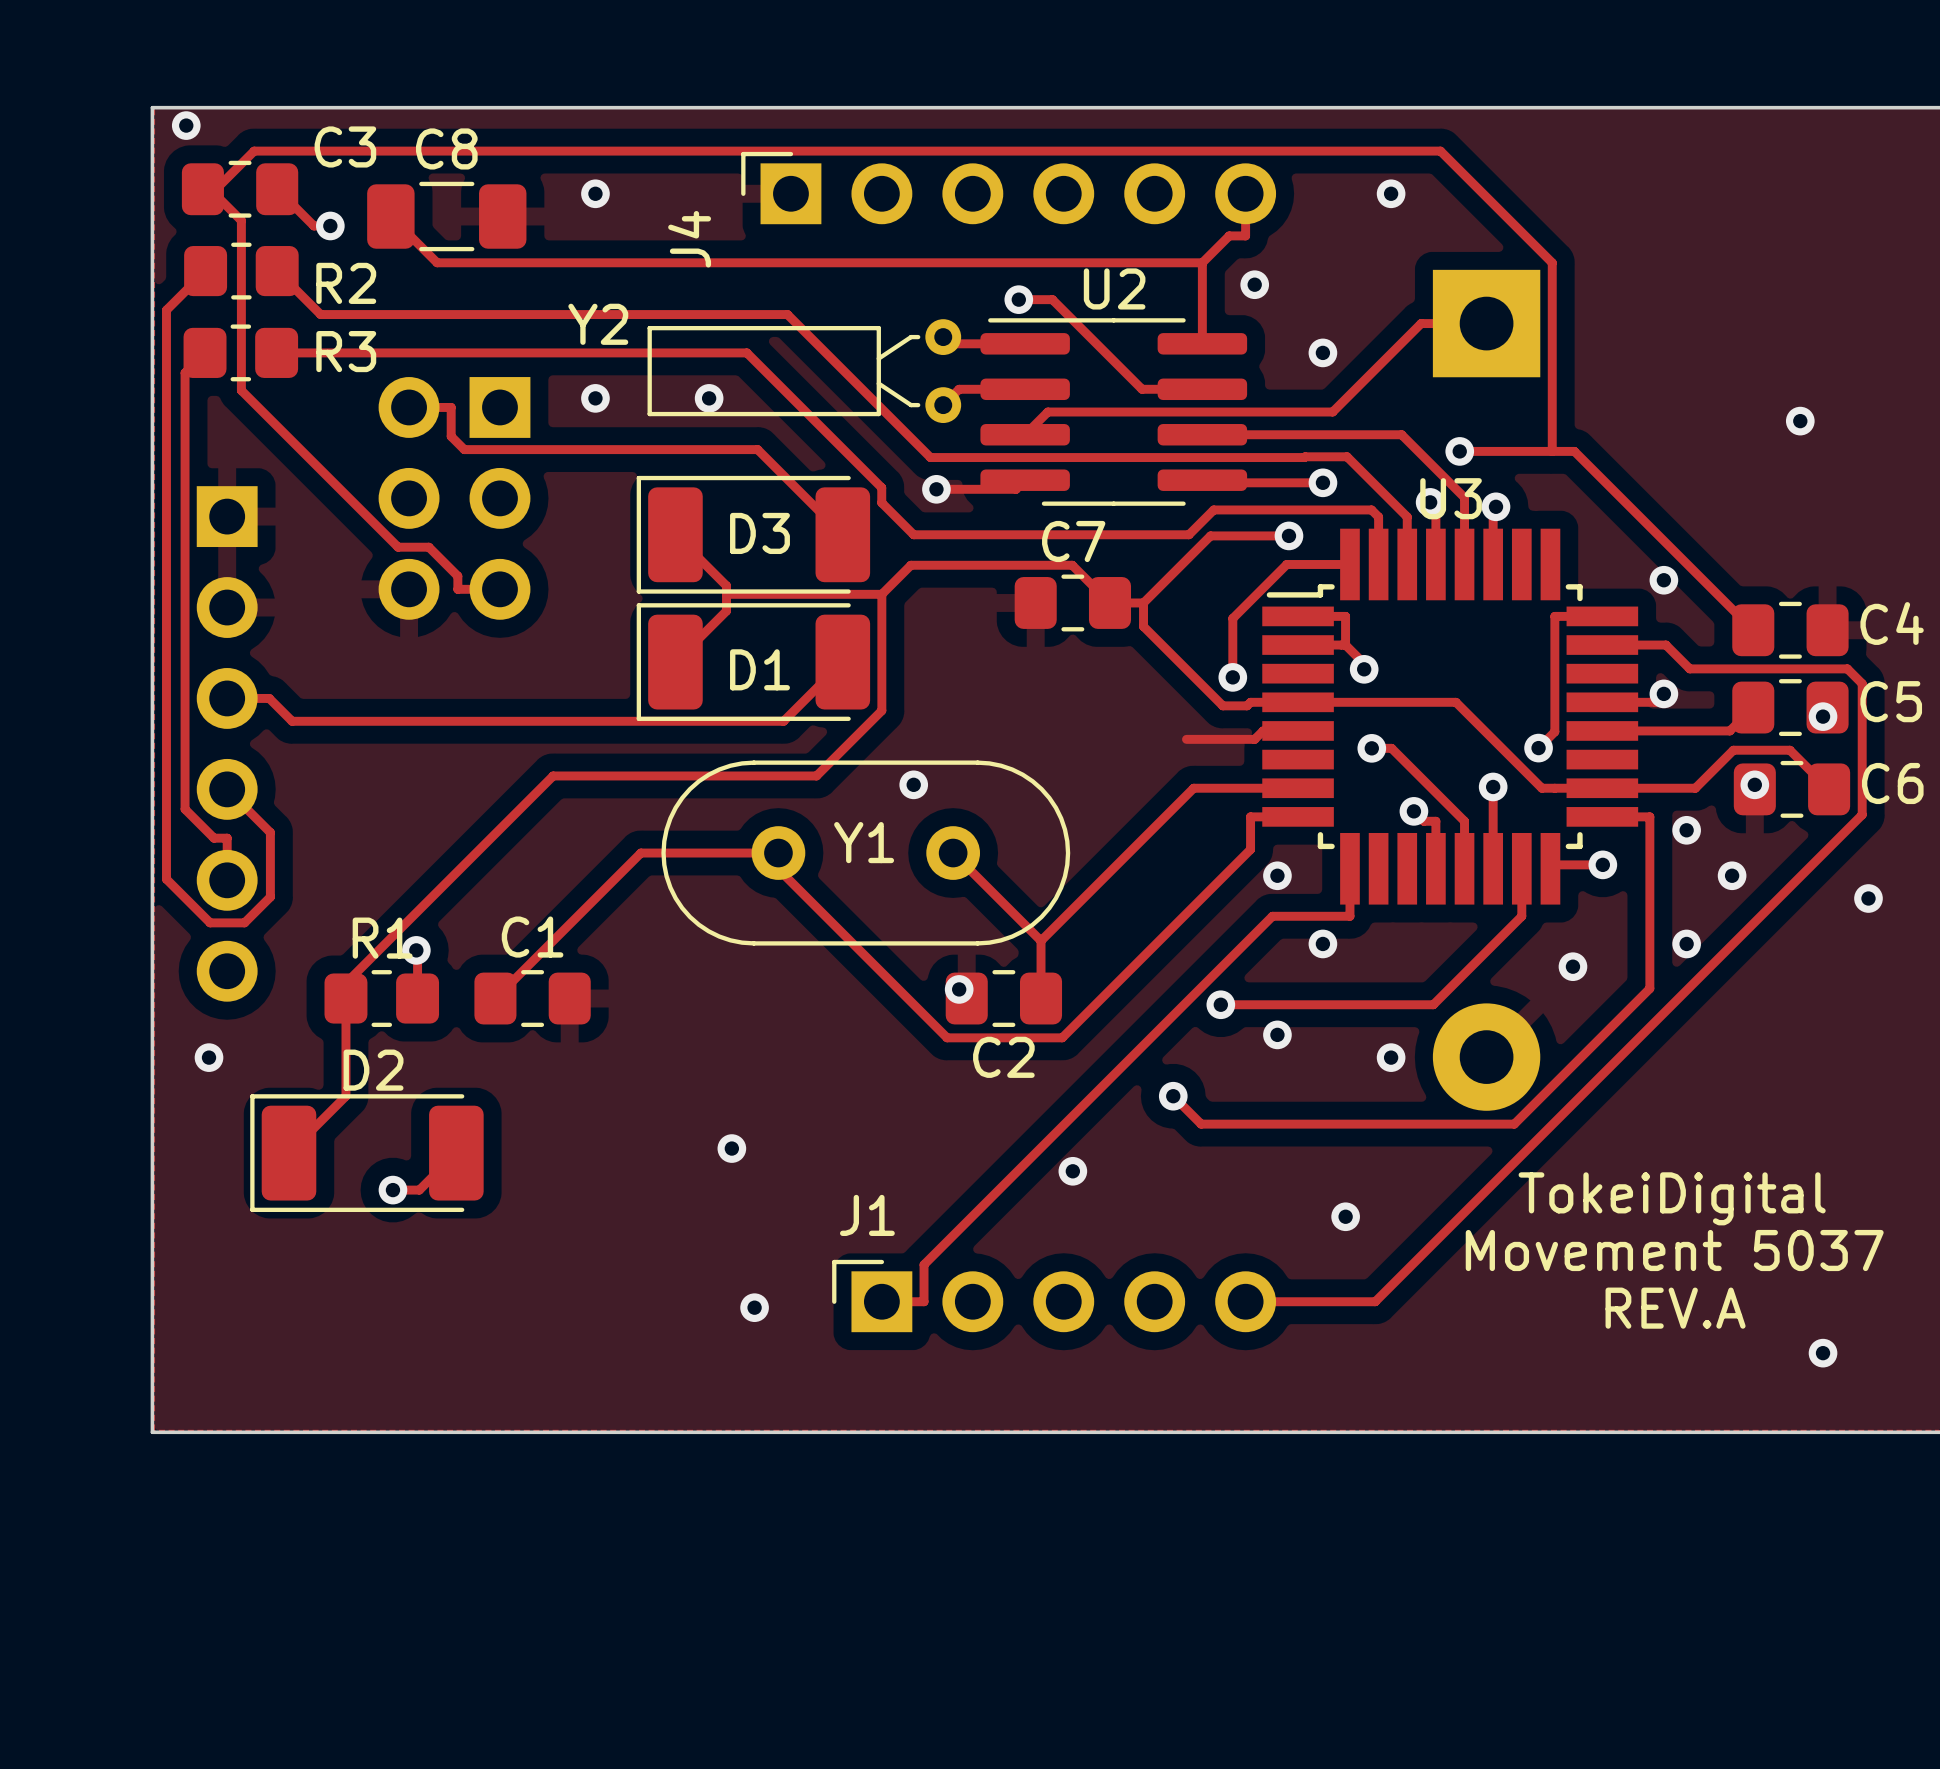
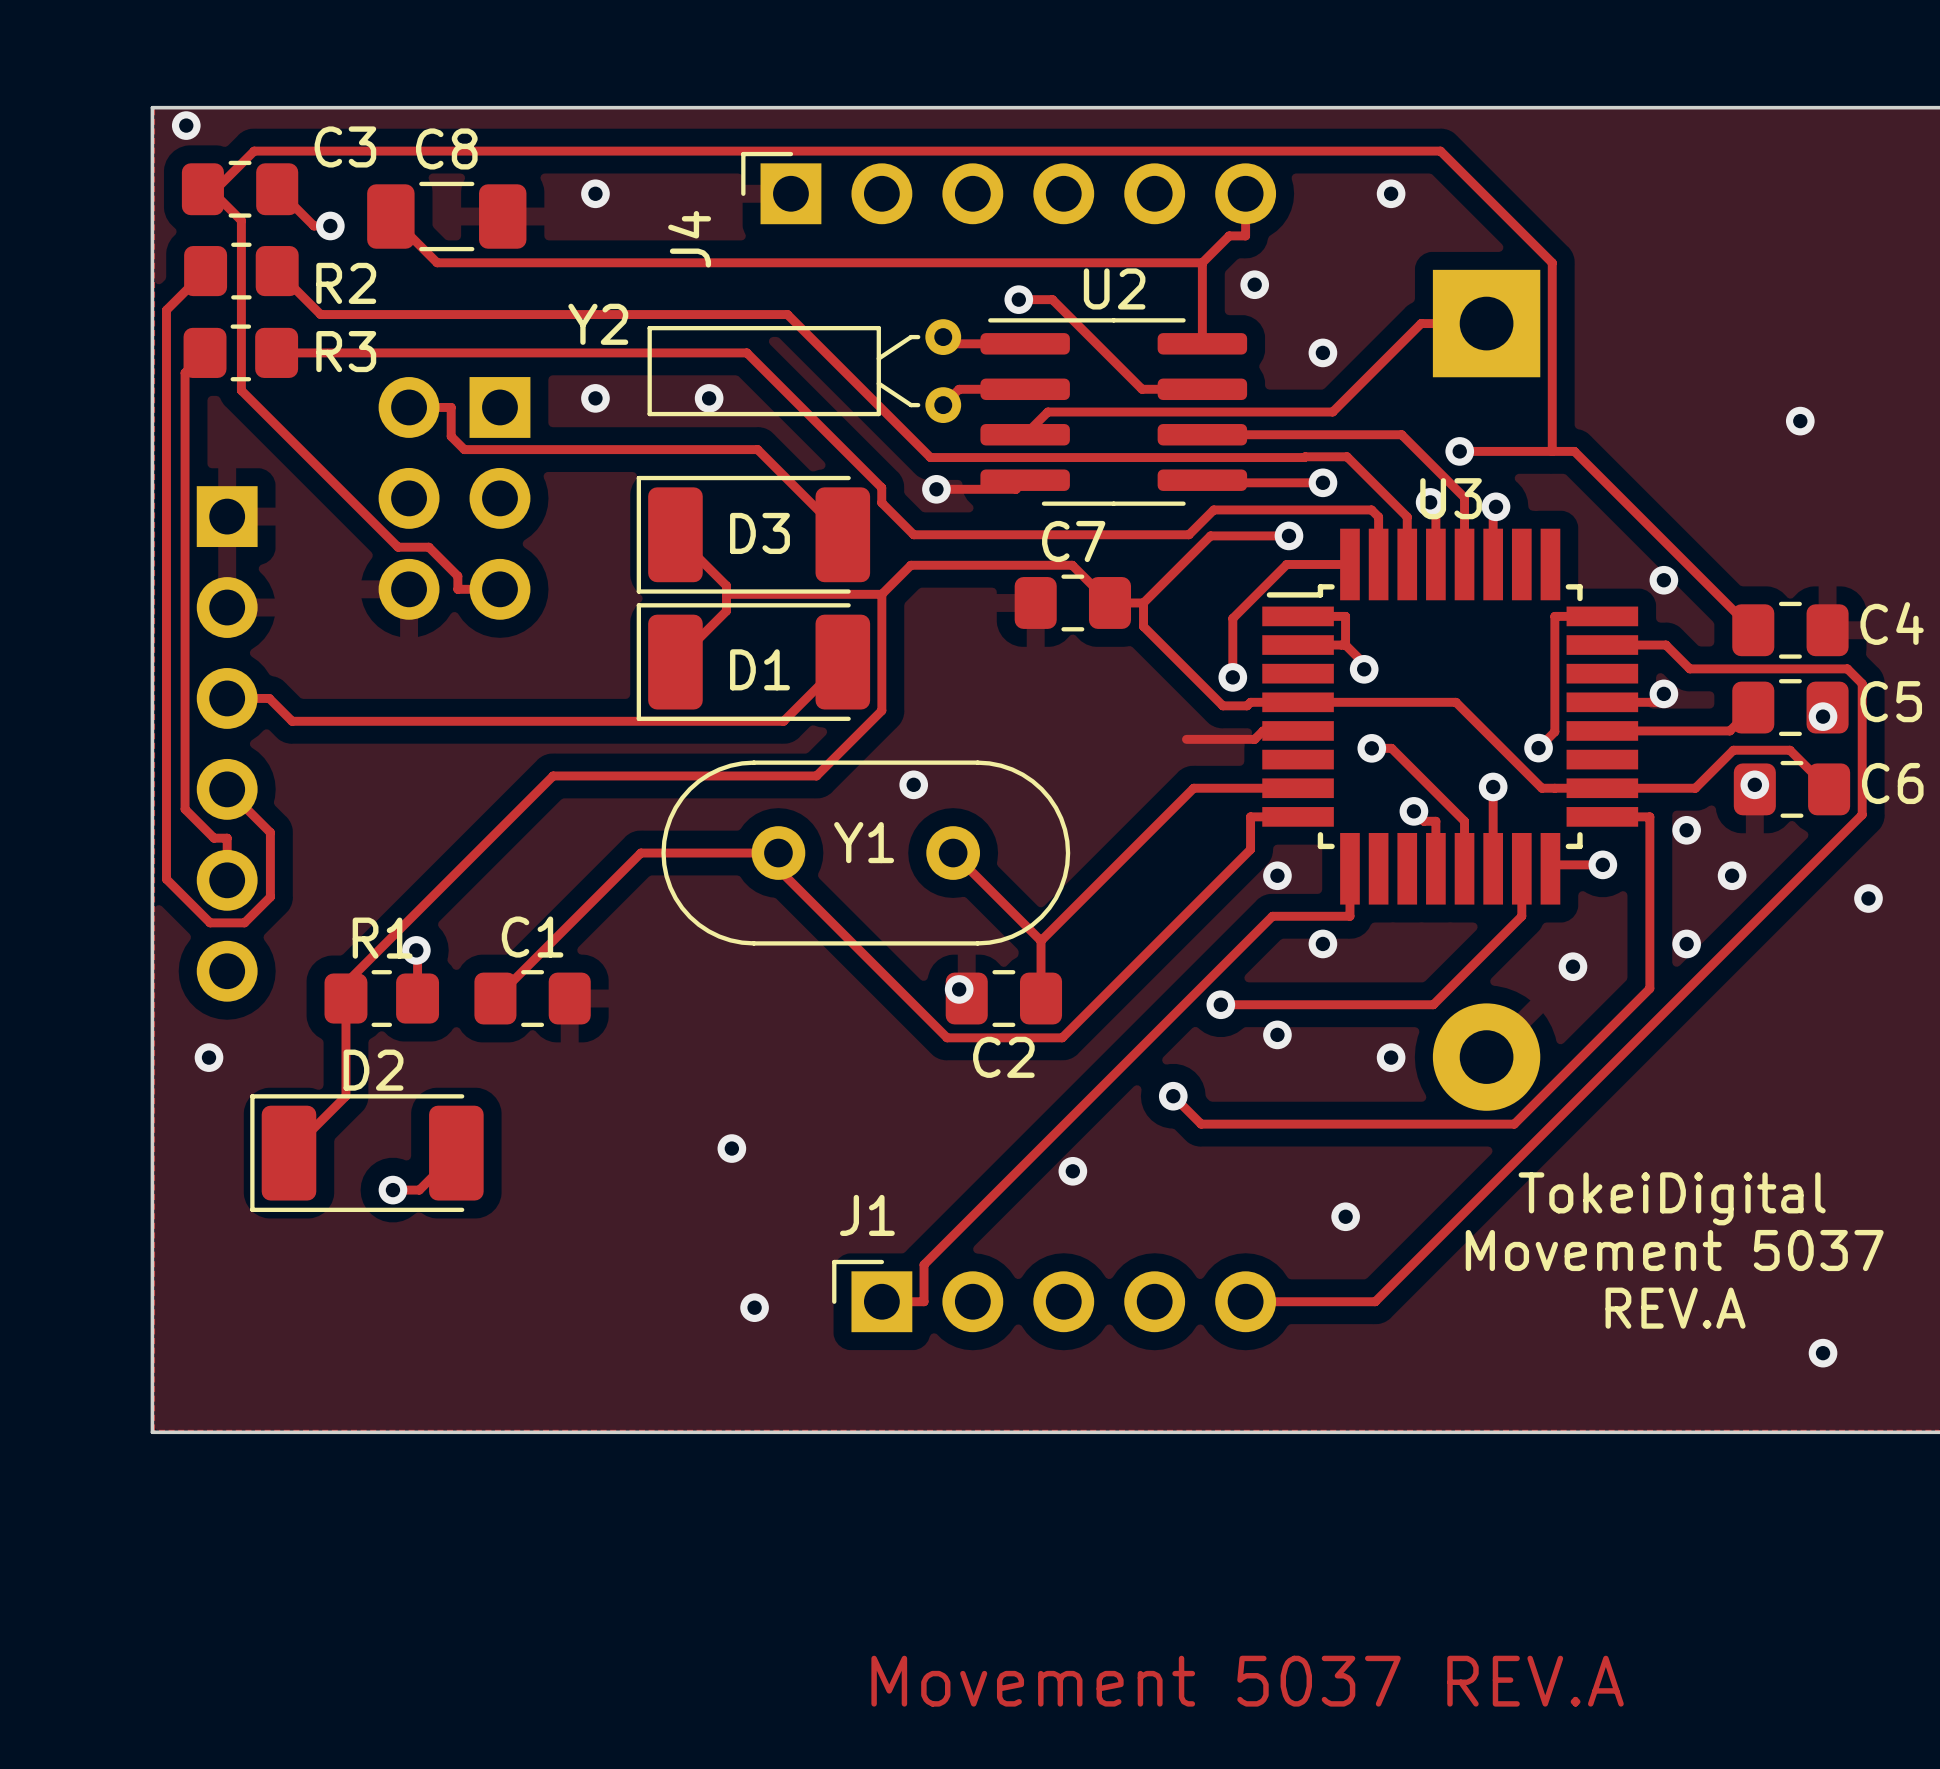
text: none -> Movement 5037 REV.A (1247, 1681)

